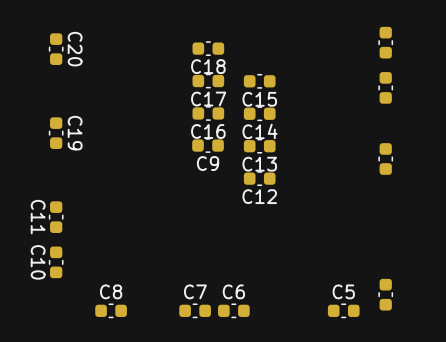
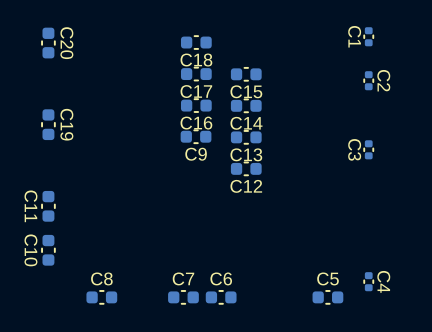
part: (385, 42) -> none
C1: none -> (368, 36)
part: (385, 87) -> none
C2: none -> (368, 80)
part: (385, 158) -> none
C3: none -> (368, 149)
part: (385, 294) -> none
C4: none -> (368, 281)

